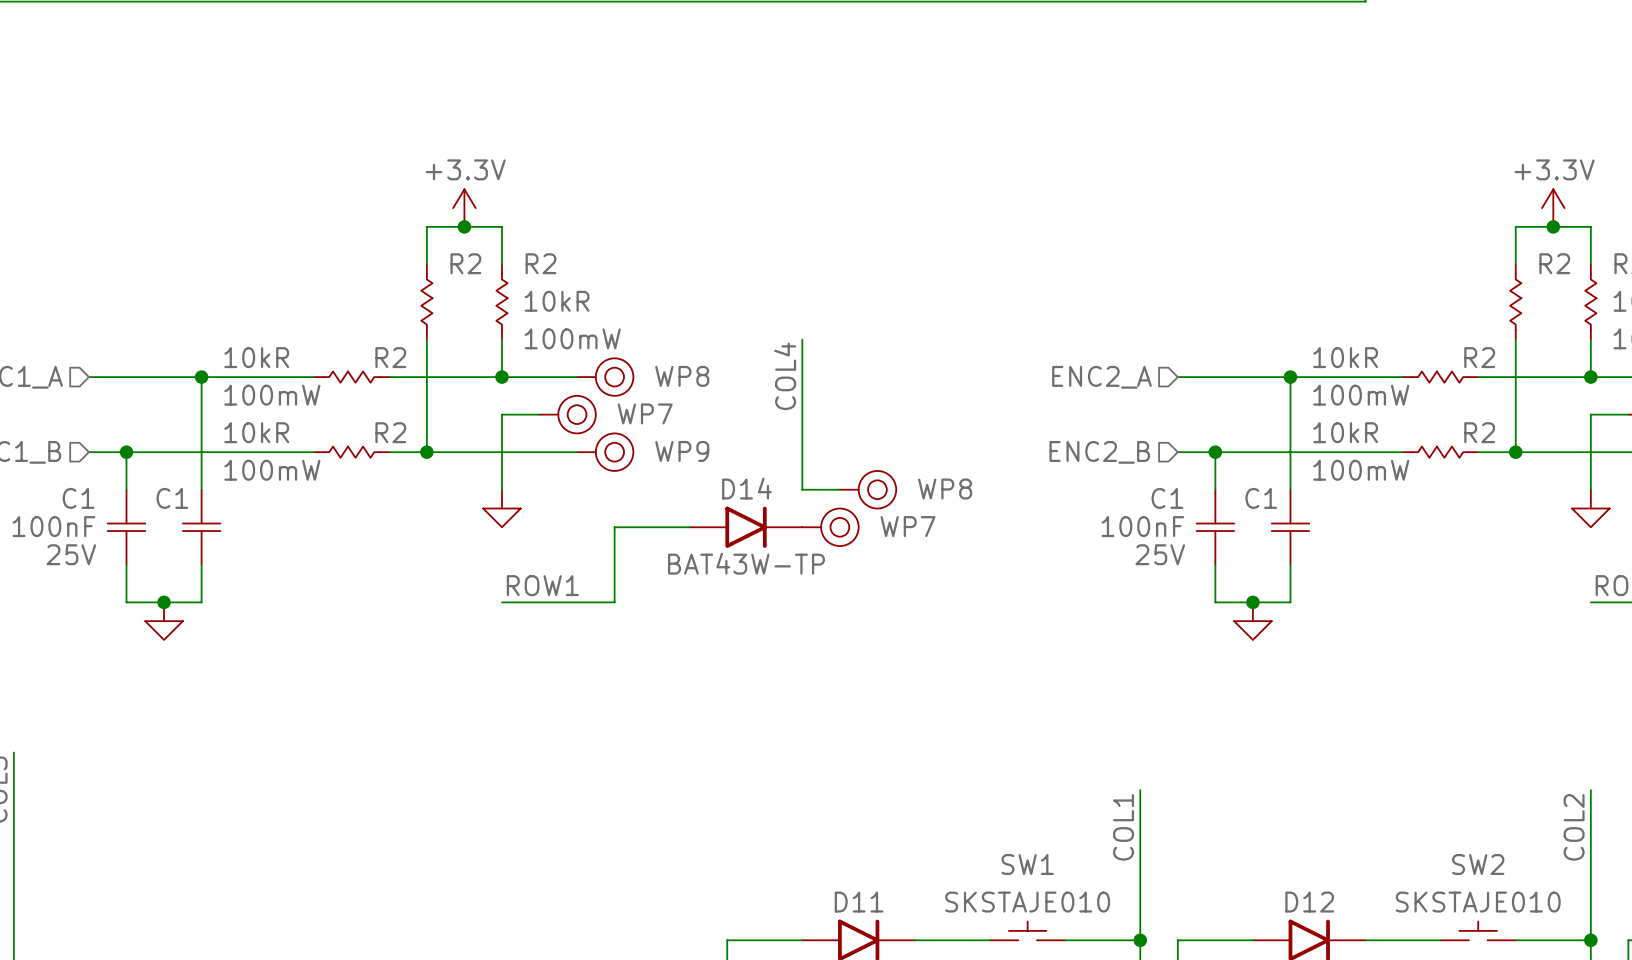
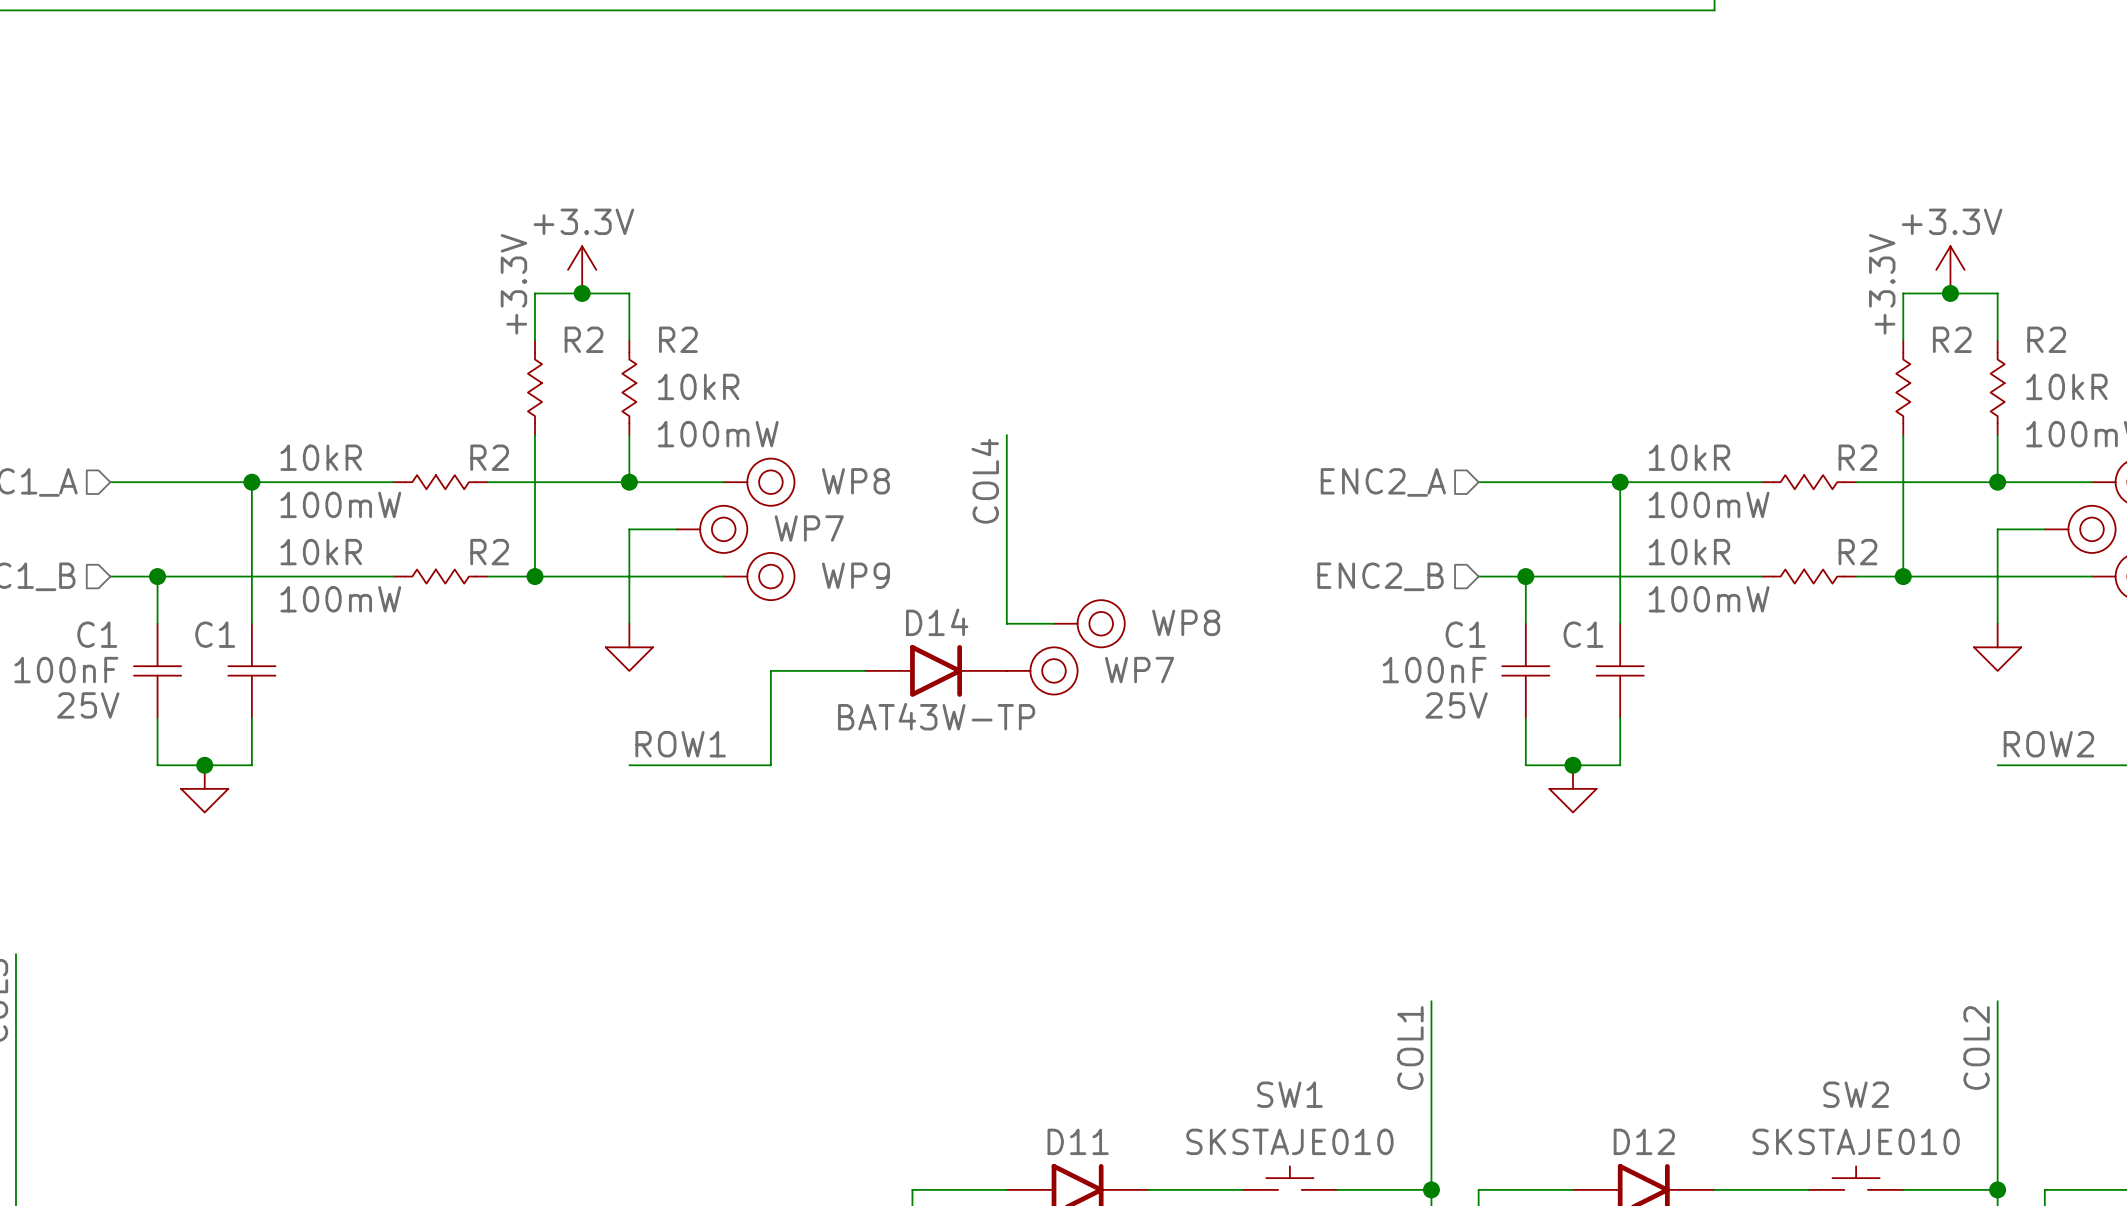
label: none -> +3.3V (513, 284)
label: none -> +3.3V (1882, 284)

